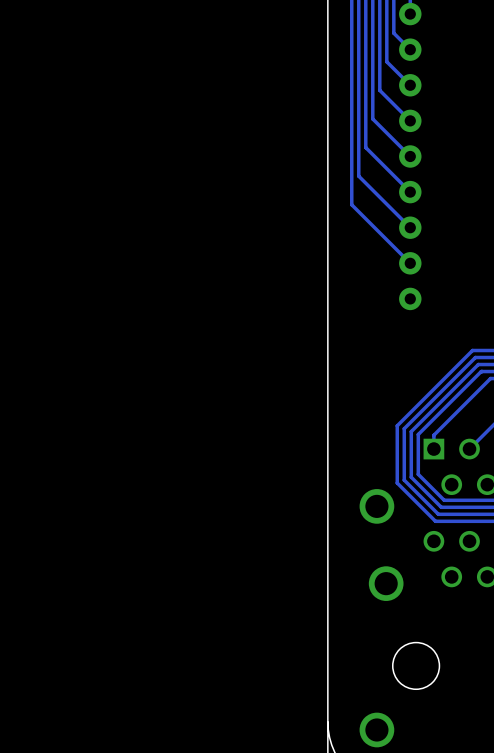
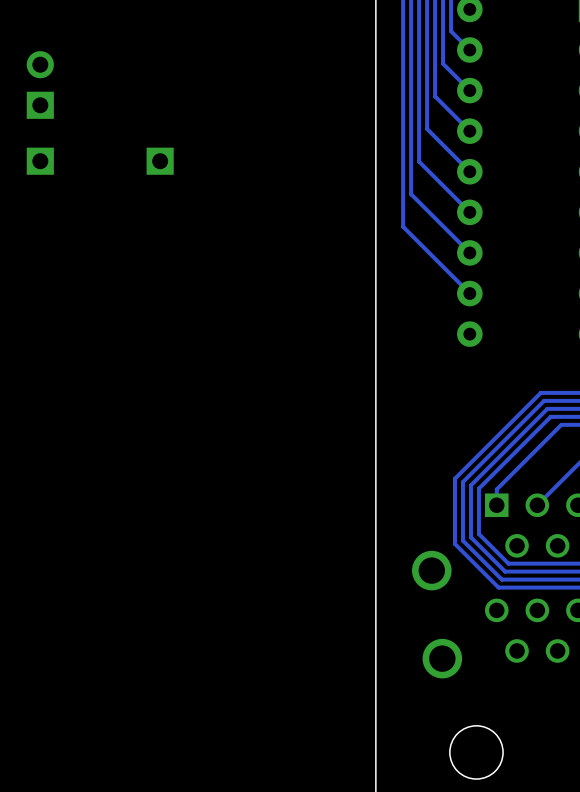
part: none -> (40, 84)
part: none -> (40, 161)
part: none -> (160, 161)

